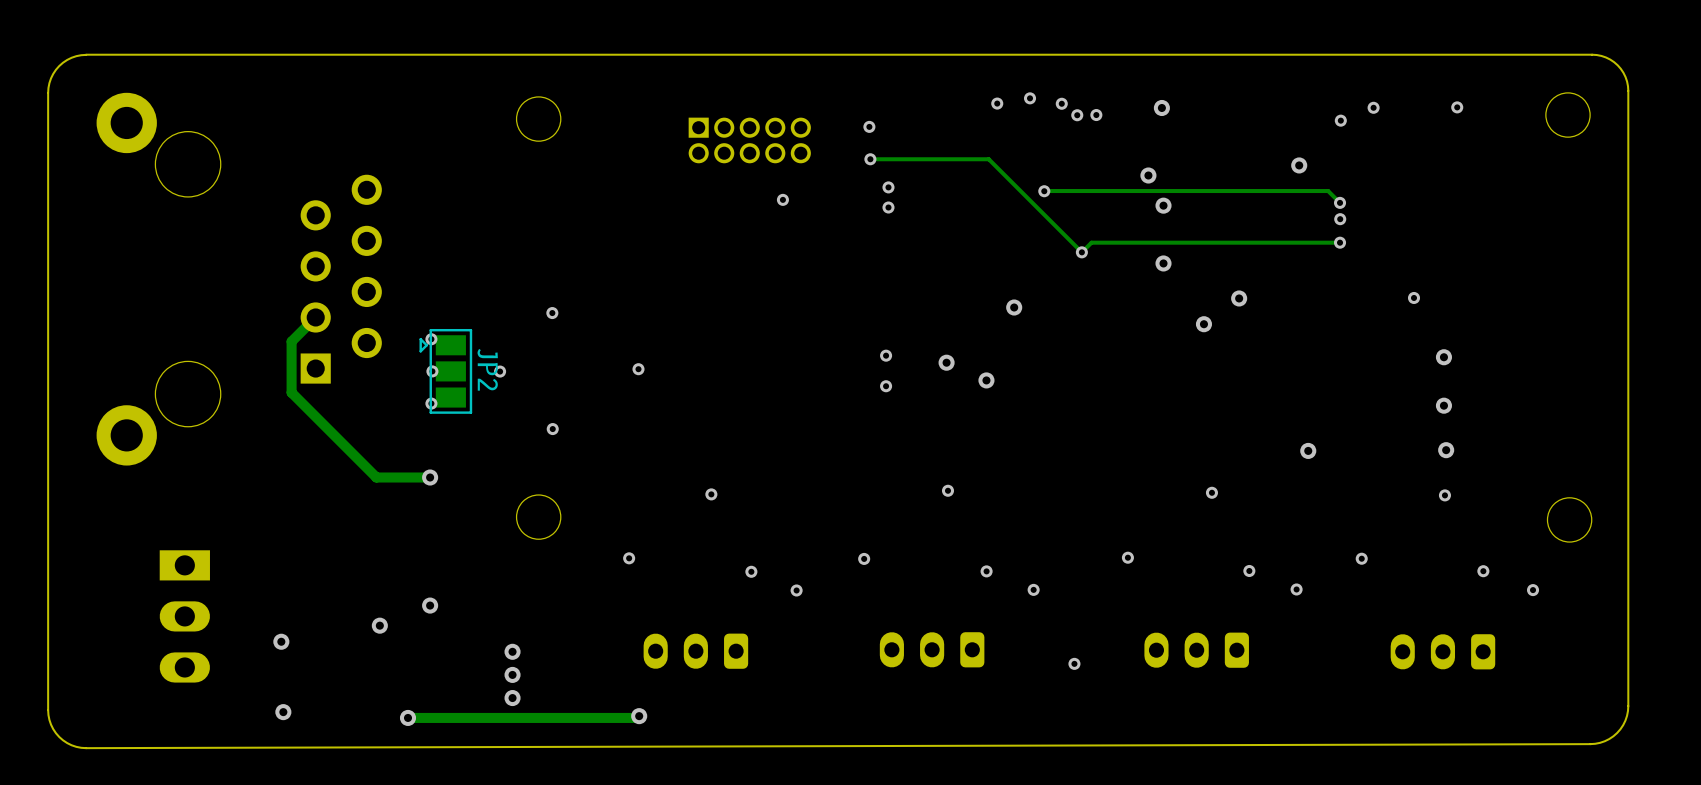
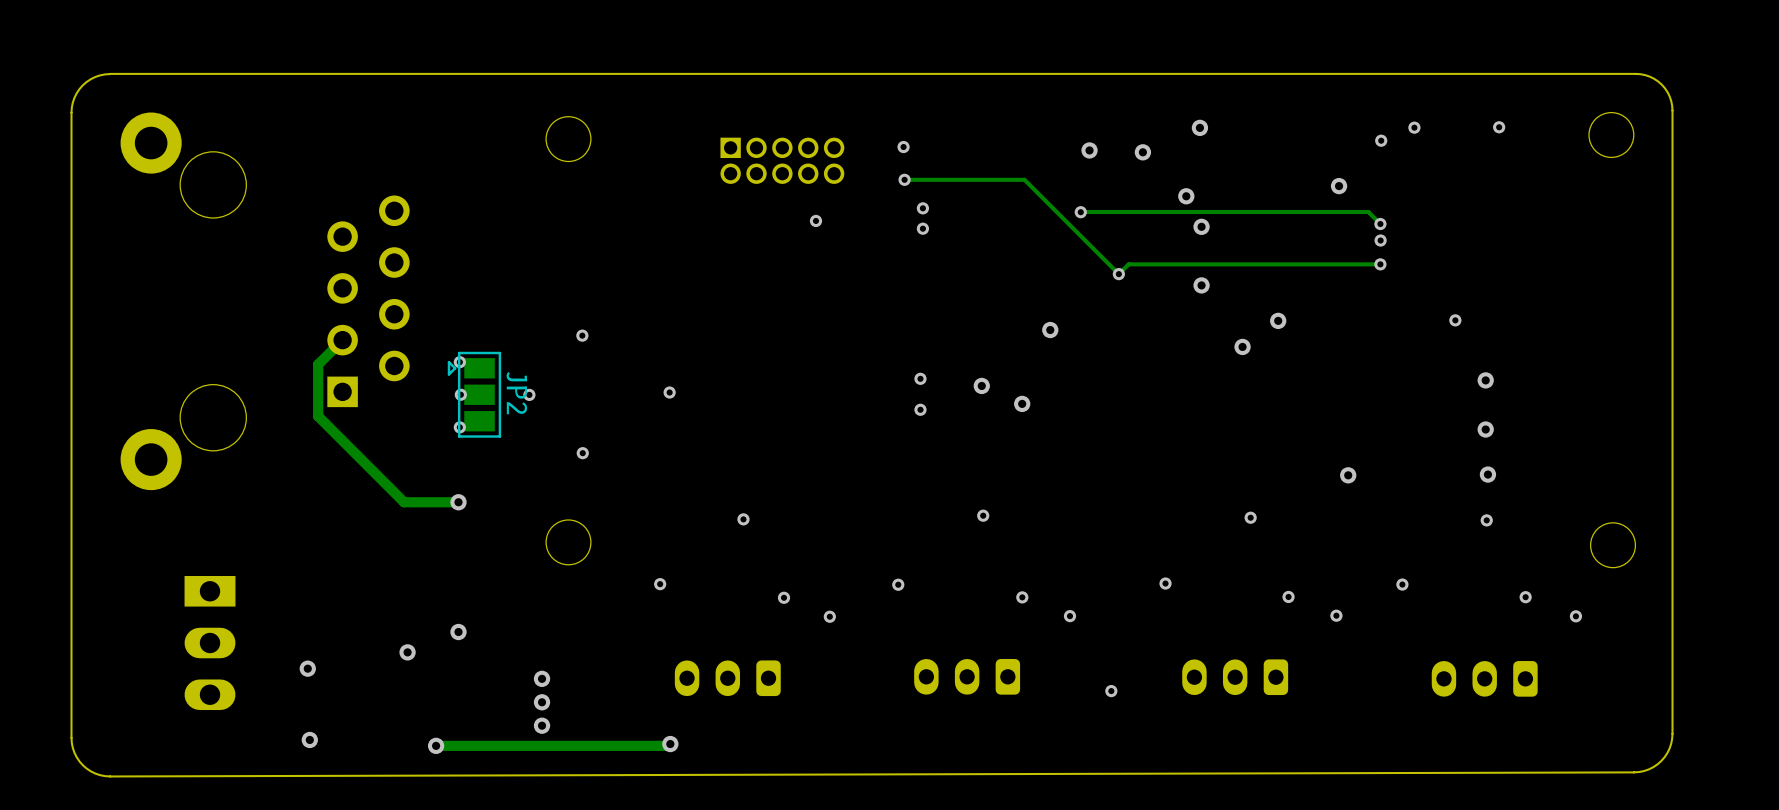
via: (1030, 98) -> none
via: (997, 103) -> none
via: (1061, 103) -> none
via: (1077, 115) -> none
via: (1096, 115) -> none
via: none -> (1089, 150)
via: none -> (1142, 152)

